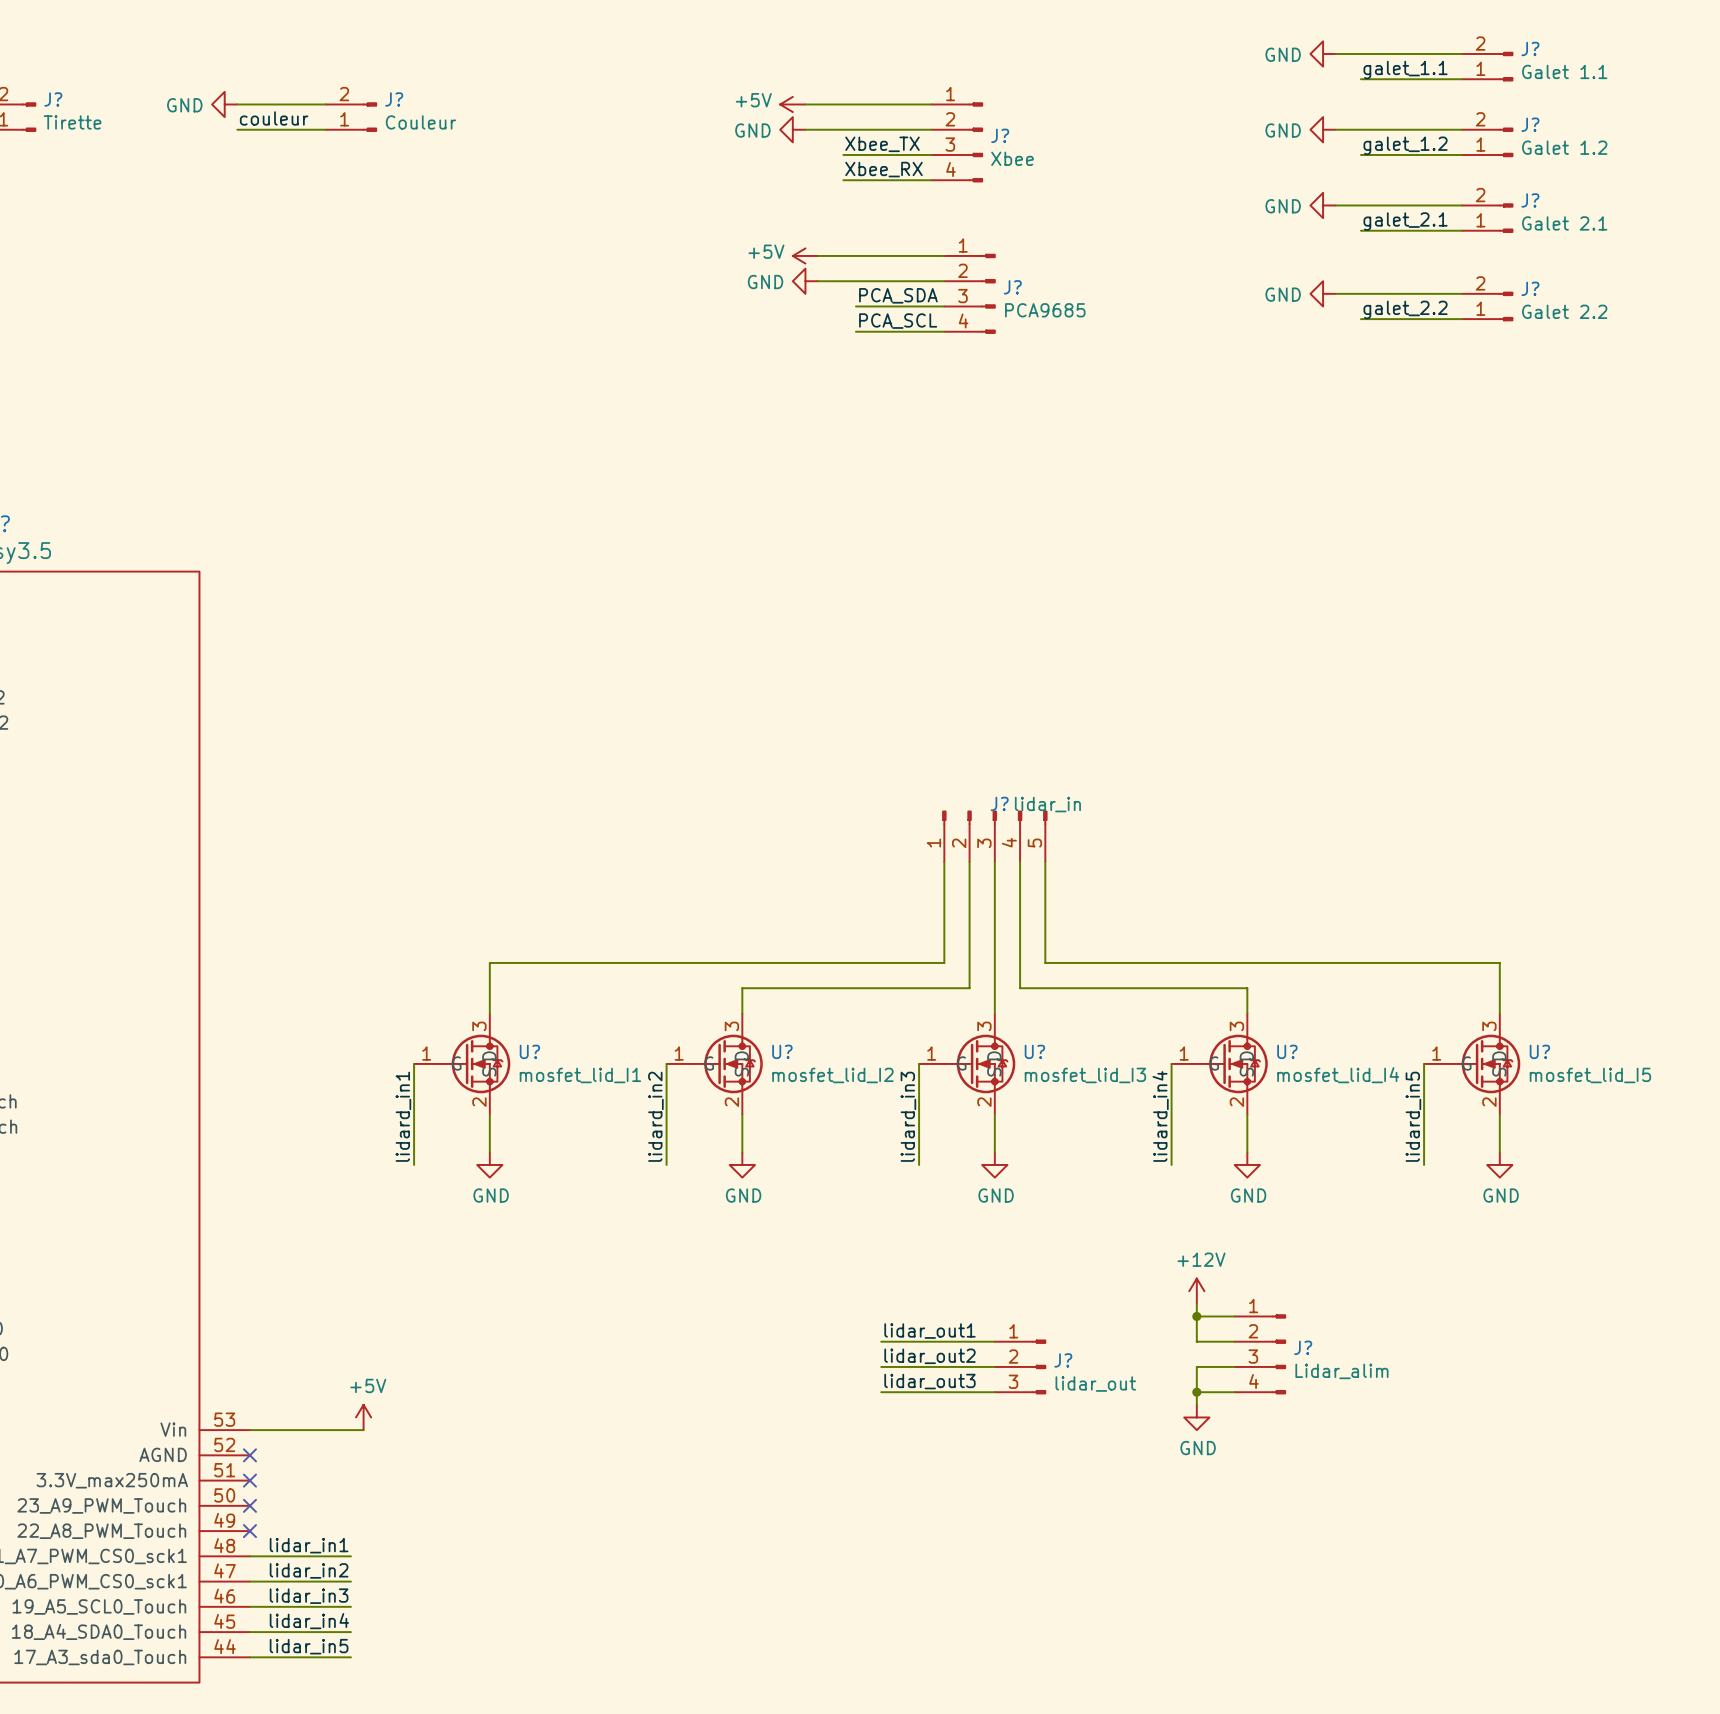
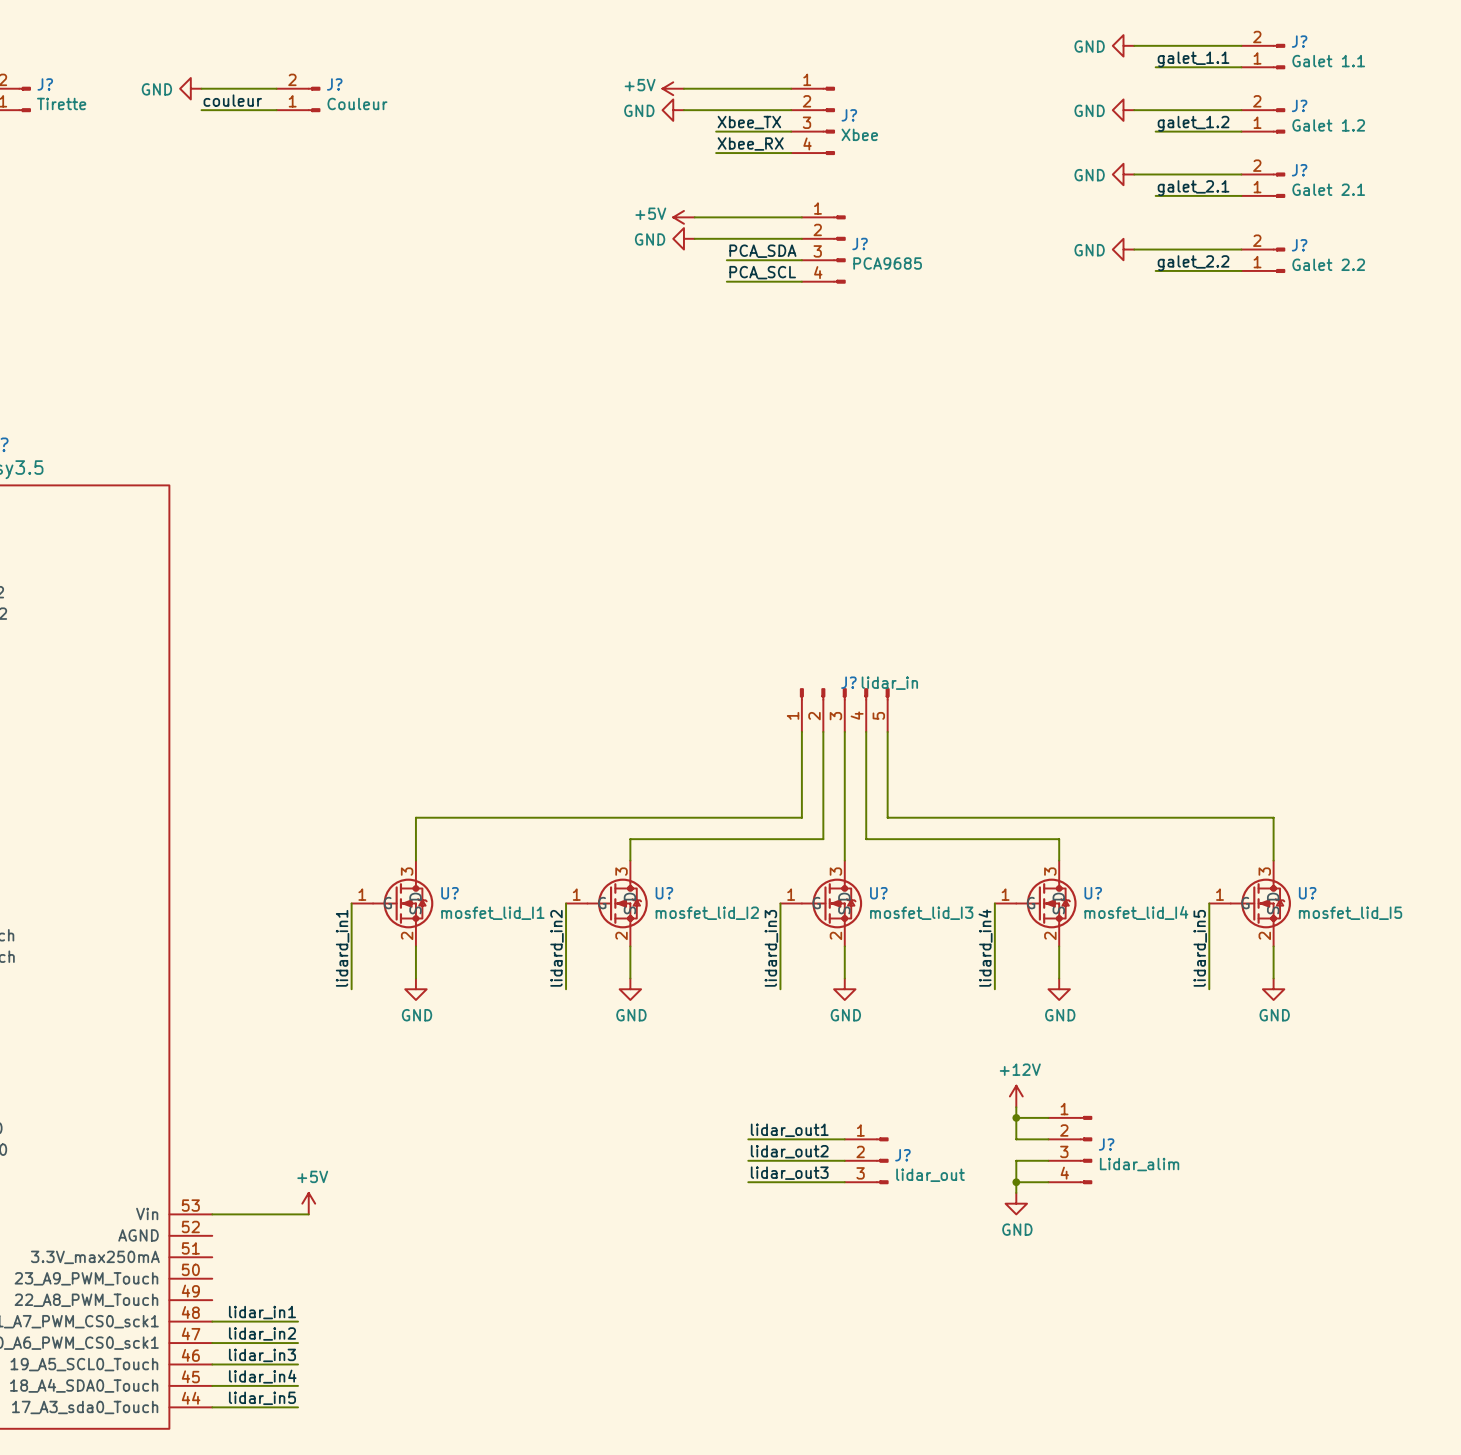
no-connect mark: (249, 1455) -> none
no-connect mark: (249, 1480) -> none
no-connect mark: (249, 1505) -> none
no-connect mark: (249, 1531) -> none

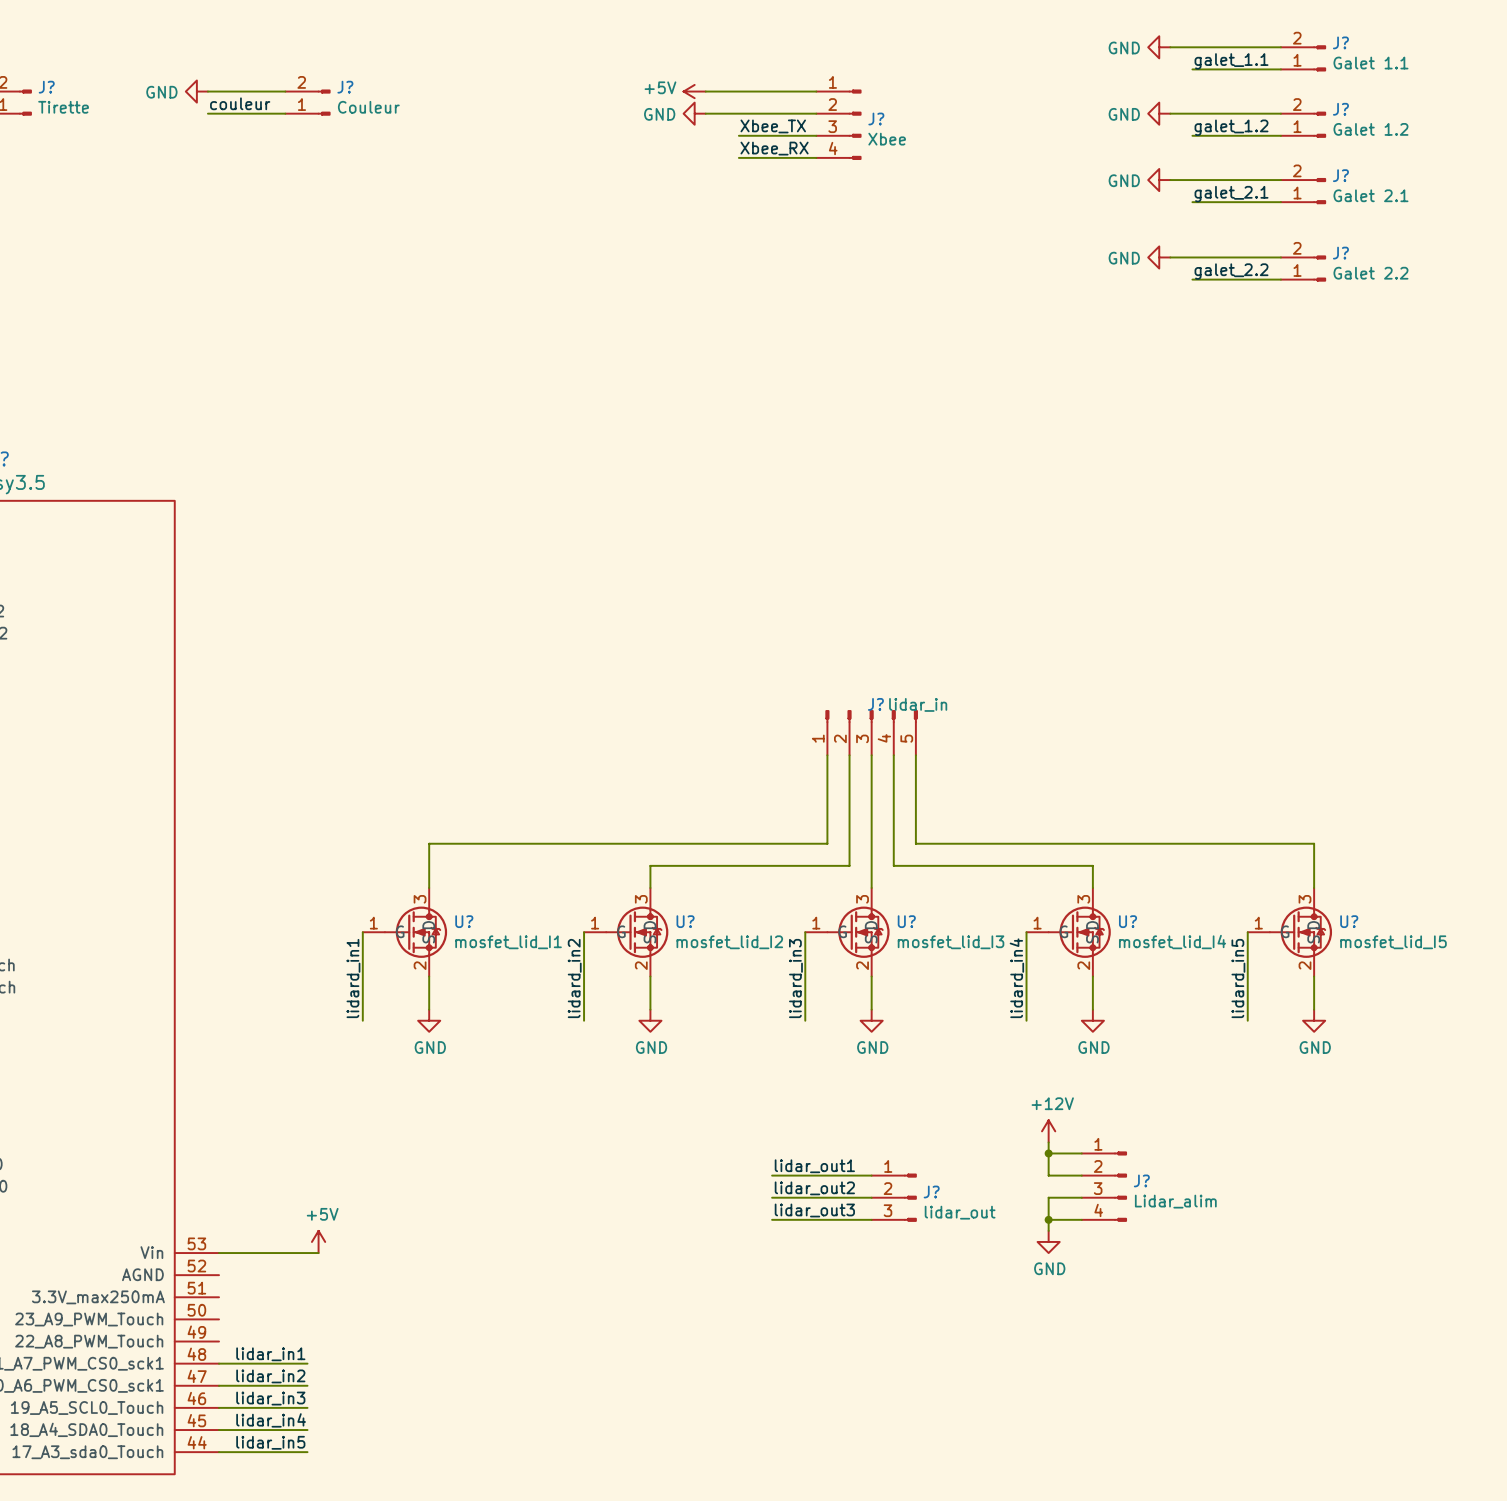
power symbol: +5V (683, 217) -> none
wire: (694, 217) (801, 217) -> none
power symbol: GND (683, 238) -> none
wire: (694, 238) (801, 238) -> none
J?: PCA9685 (823, 249) -> none
label: PCA_SDA (762, 251) -> none
wire: (726, 260) (801, 260) -> none
label: PCA_SCL (762, 272) -> none
wire: (726, 281) (801, 281) -> none

